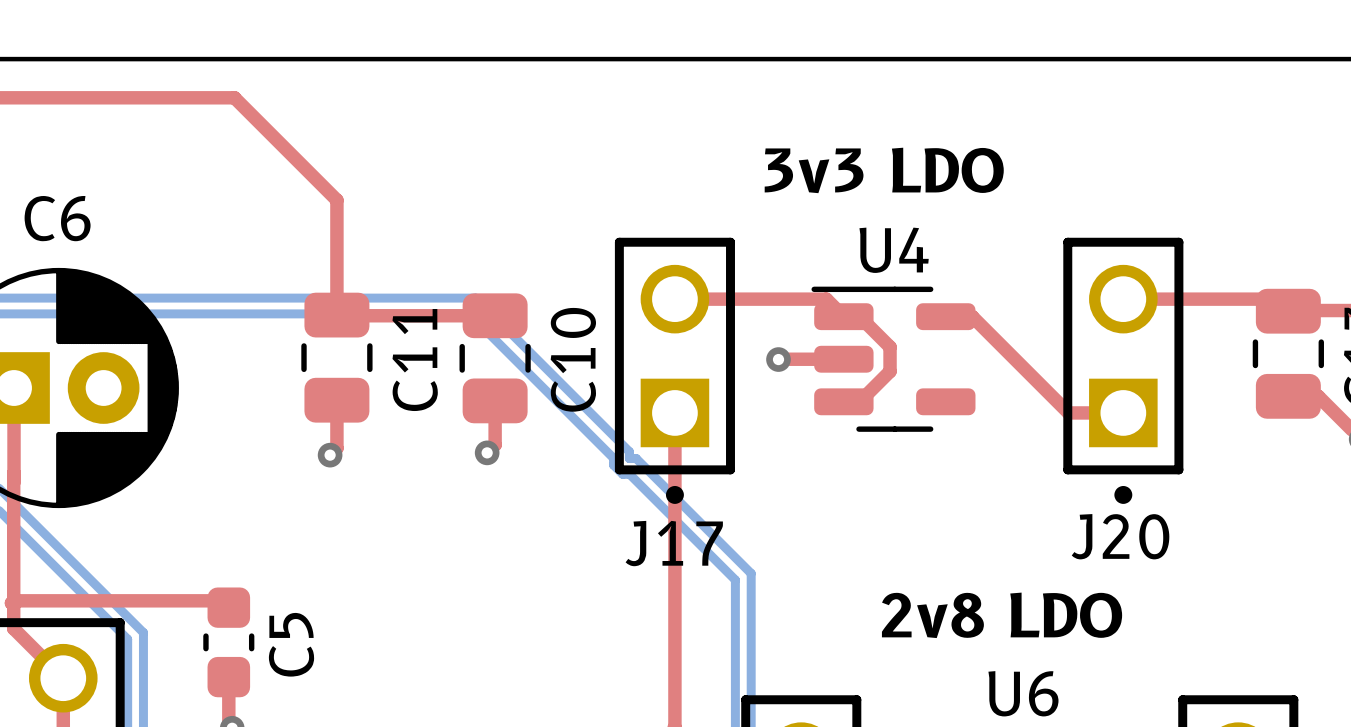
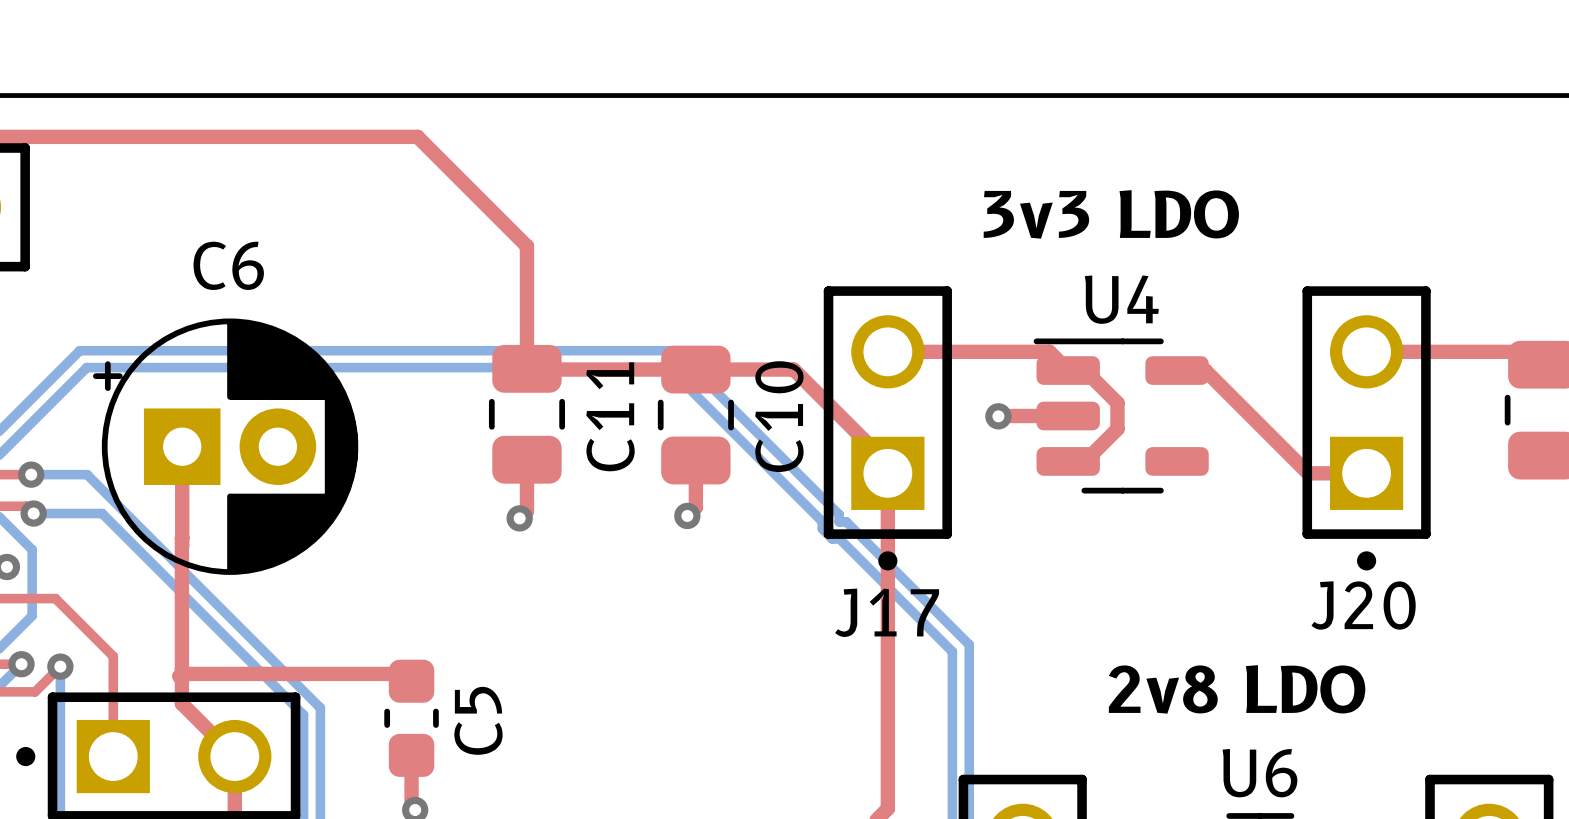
top track: none -> (695, 369) (793, 369) (887, 463) (887, 473)

